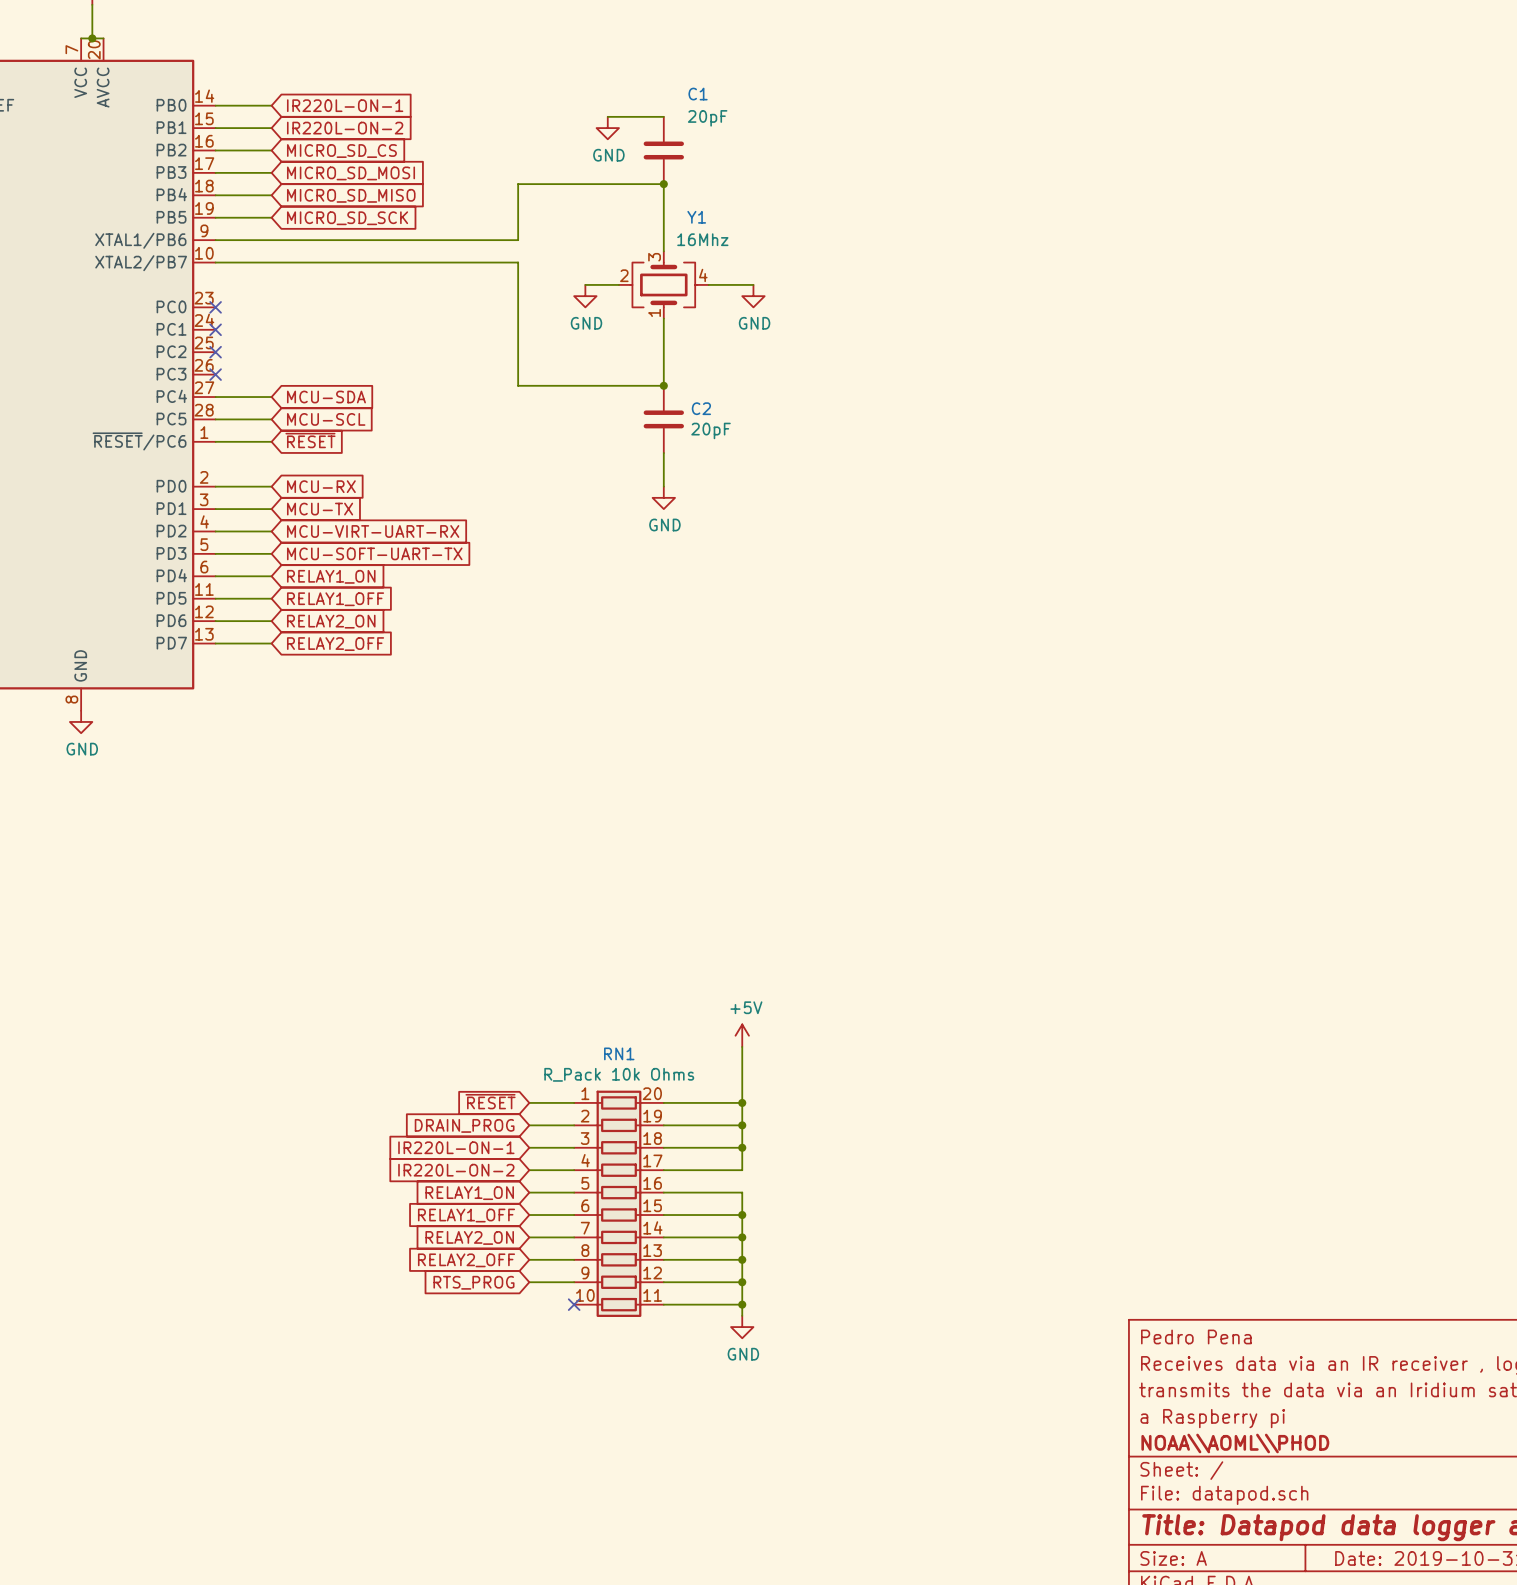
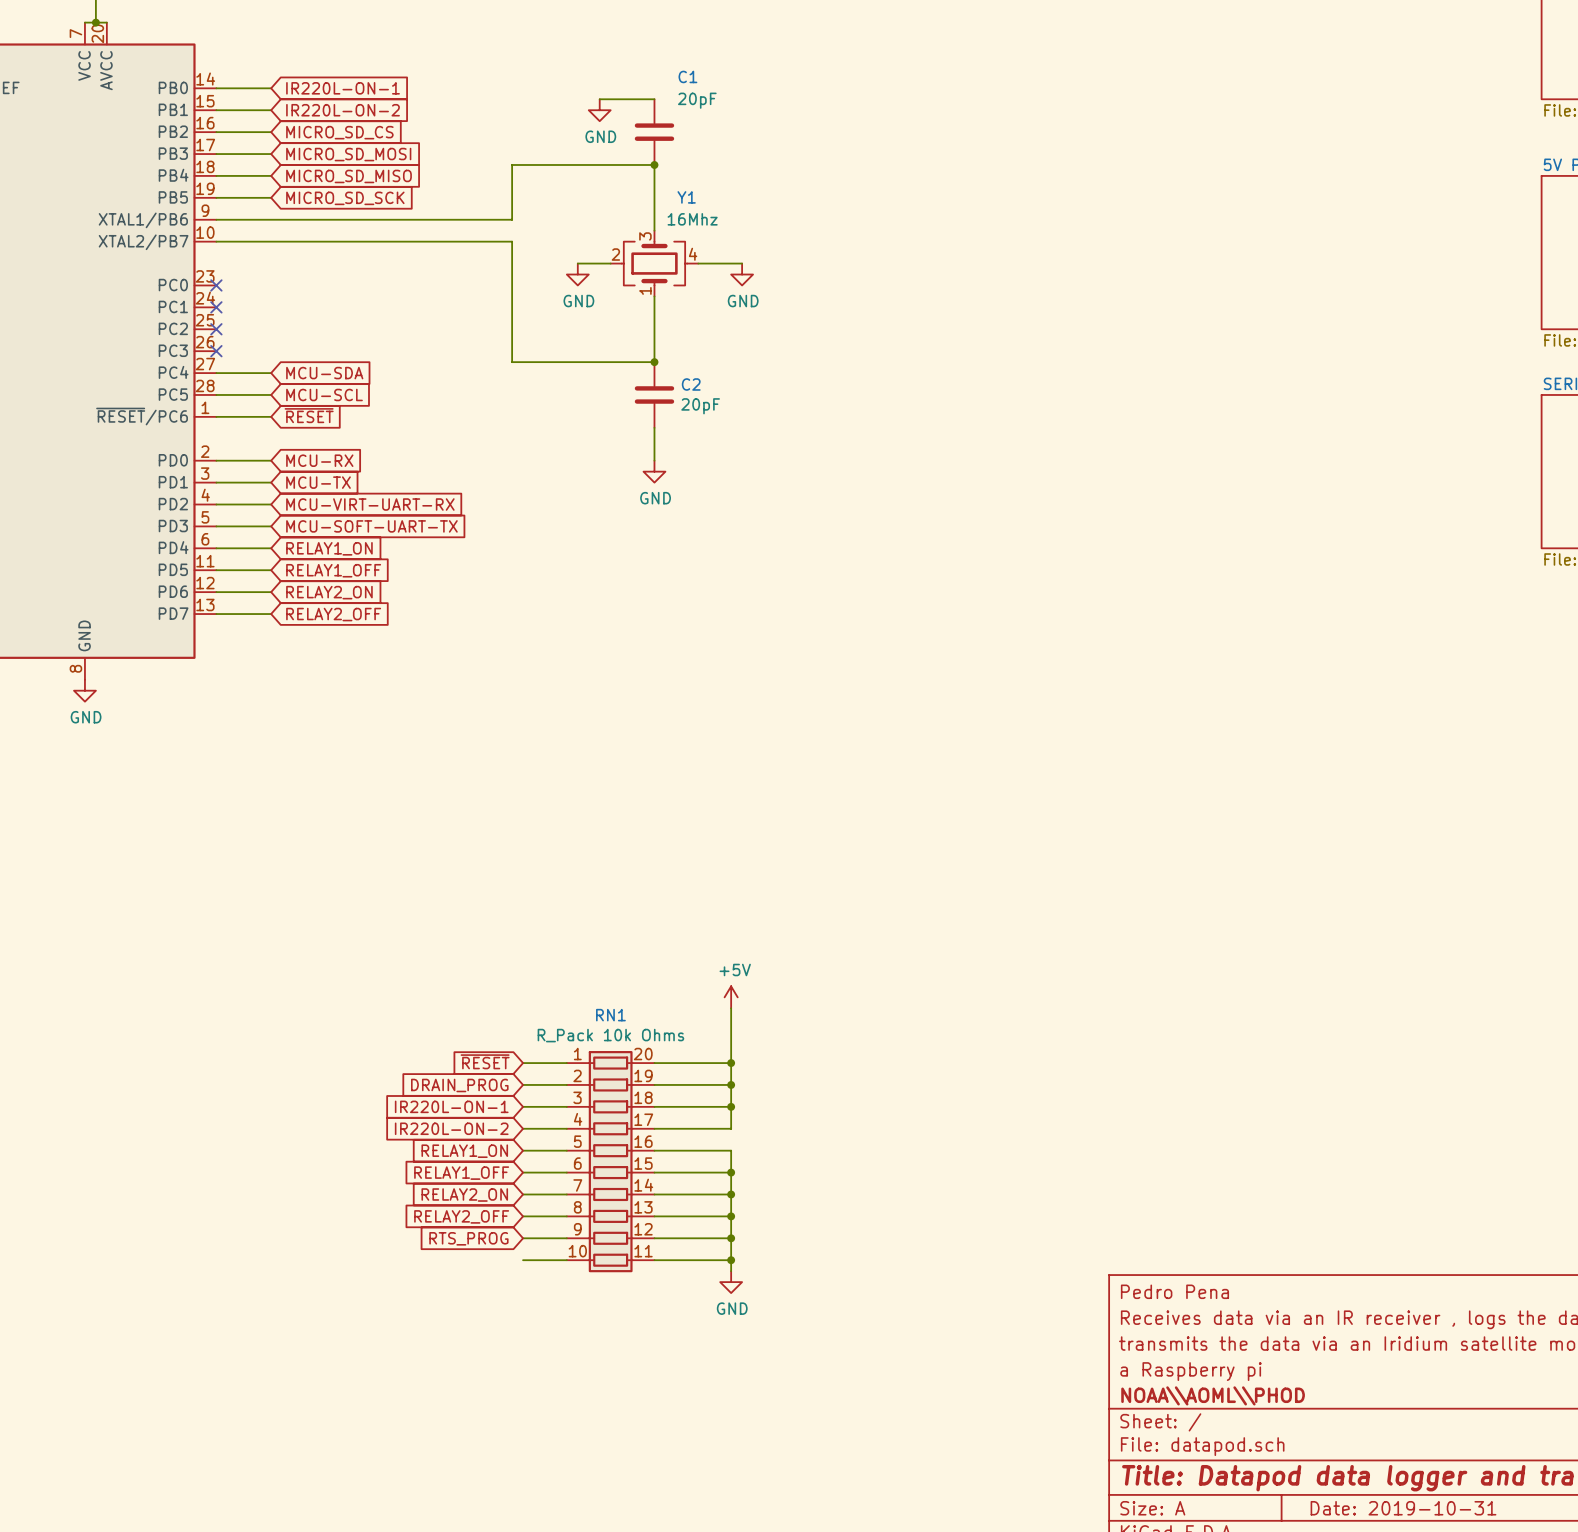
wire: none -> (523, 1260) (566, 1260)
no-connect mark: (574, 1304) -> none

